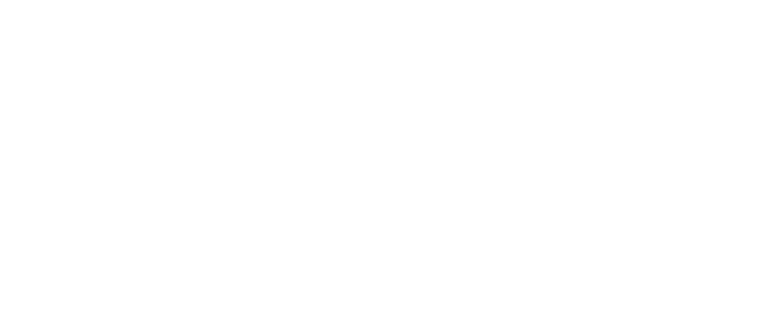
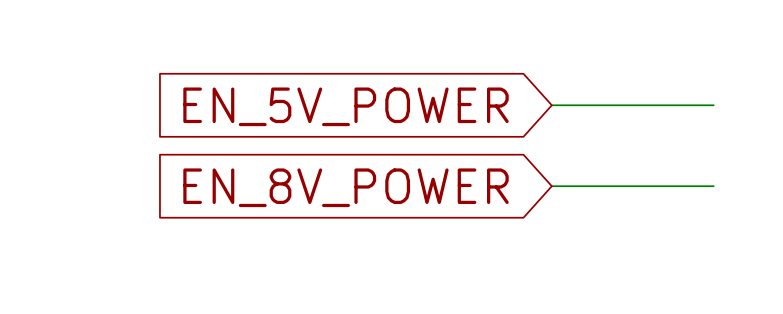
wire: none -> (551, 105) (713, 105)
global label: none -> EN_5V_POWER (346, 106)
wire: none -> (551, 186) (713, 186)
global label: none -> EN_8V_POWER (346, 187)

